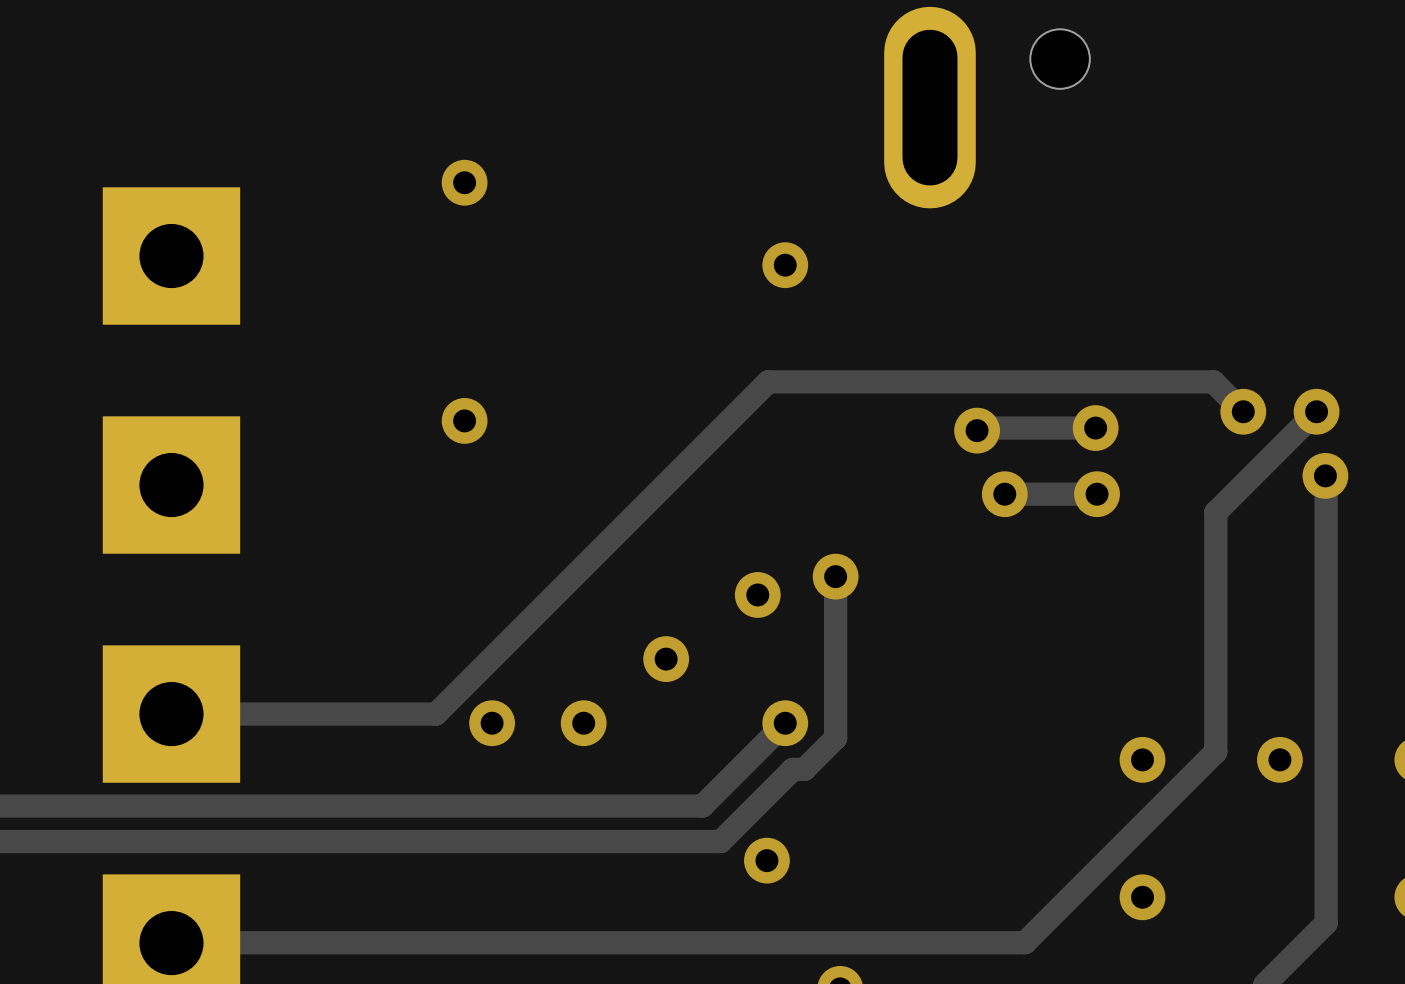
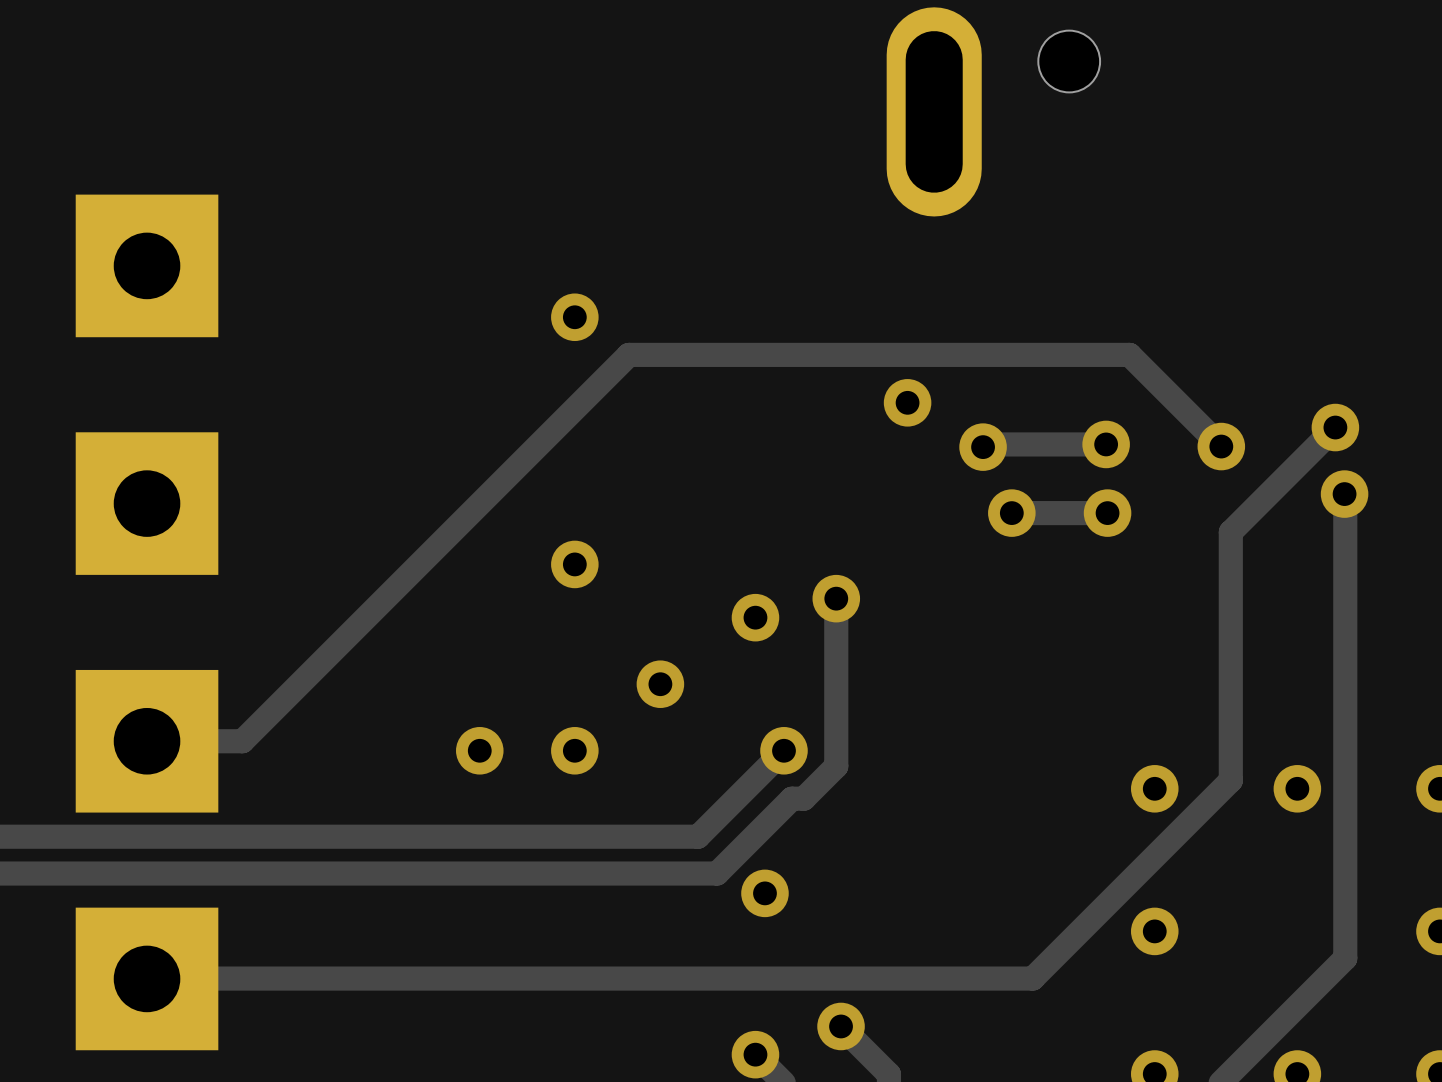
via: (464, 182) -> none
via: (785, 265) -> none
via: none -> (574, 317)
via: none -> (907, 402)
track: (1243, 411) (1213, 381) (768, 381) (435, 714) (263, 714) -> (1221, 446) (1129, 354) (628, 354) (242, 741)
via position: (1243, 411) -> (1221, 446)
via: (464, 420) -> none
via: none -> (574, 564)

